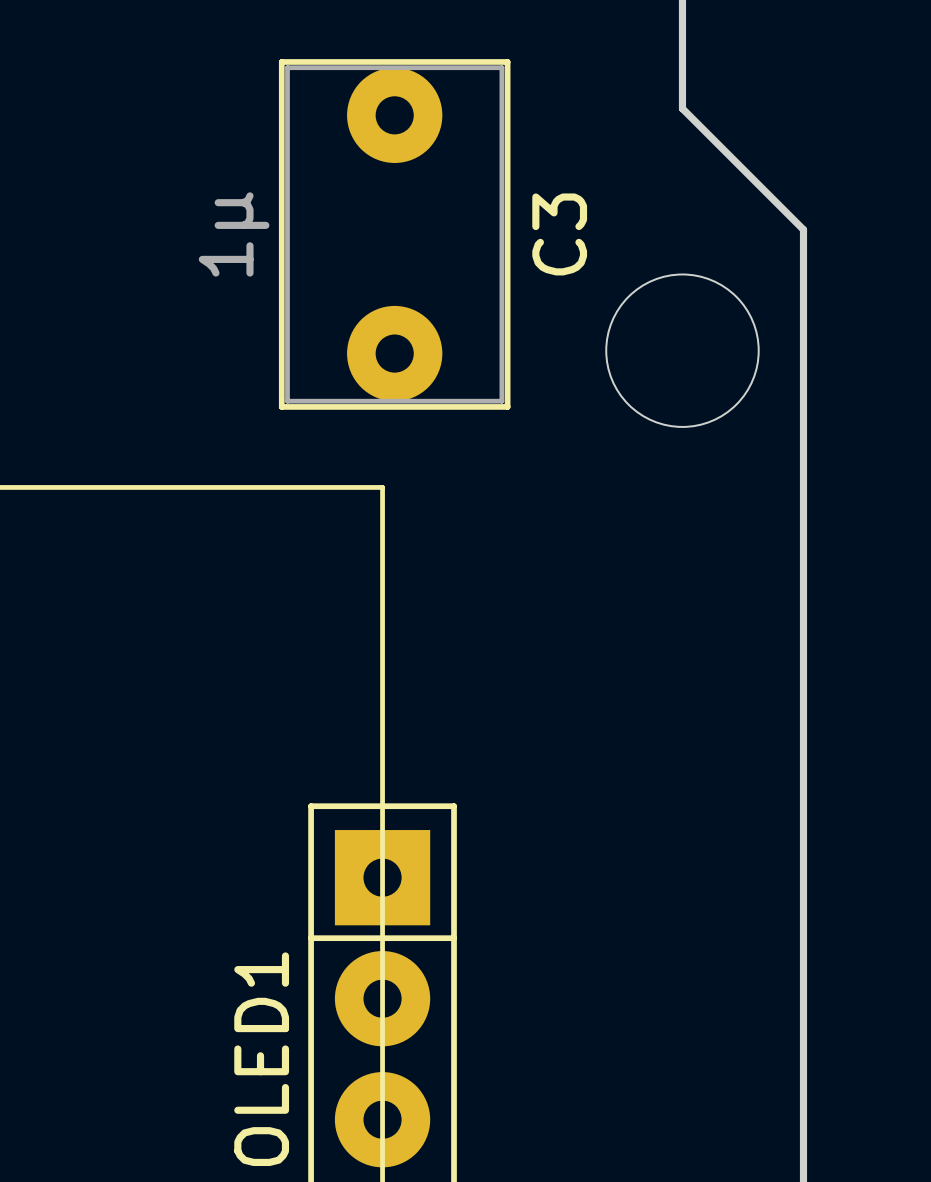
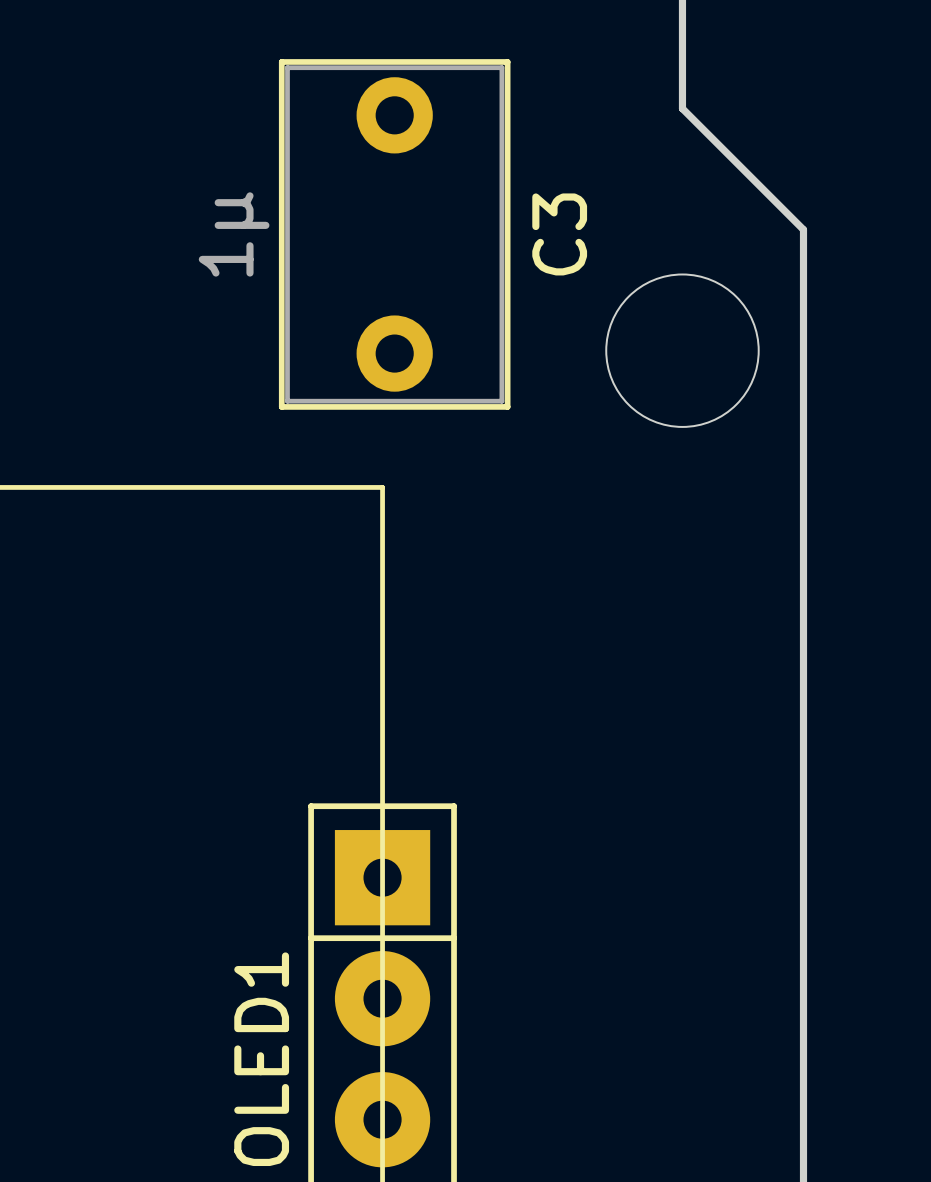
C3 footprint: [278, 59, 511, 410] -> [278, 59, 511, 410]

